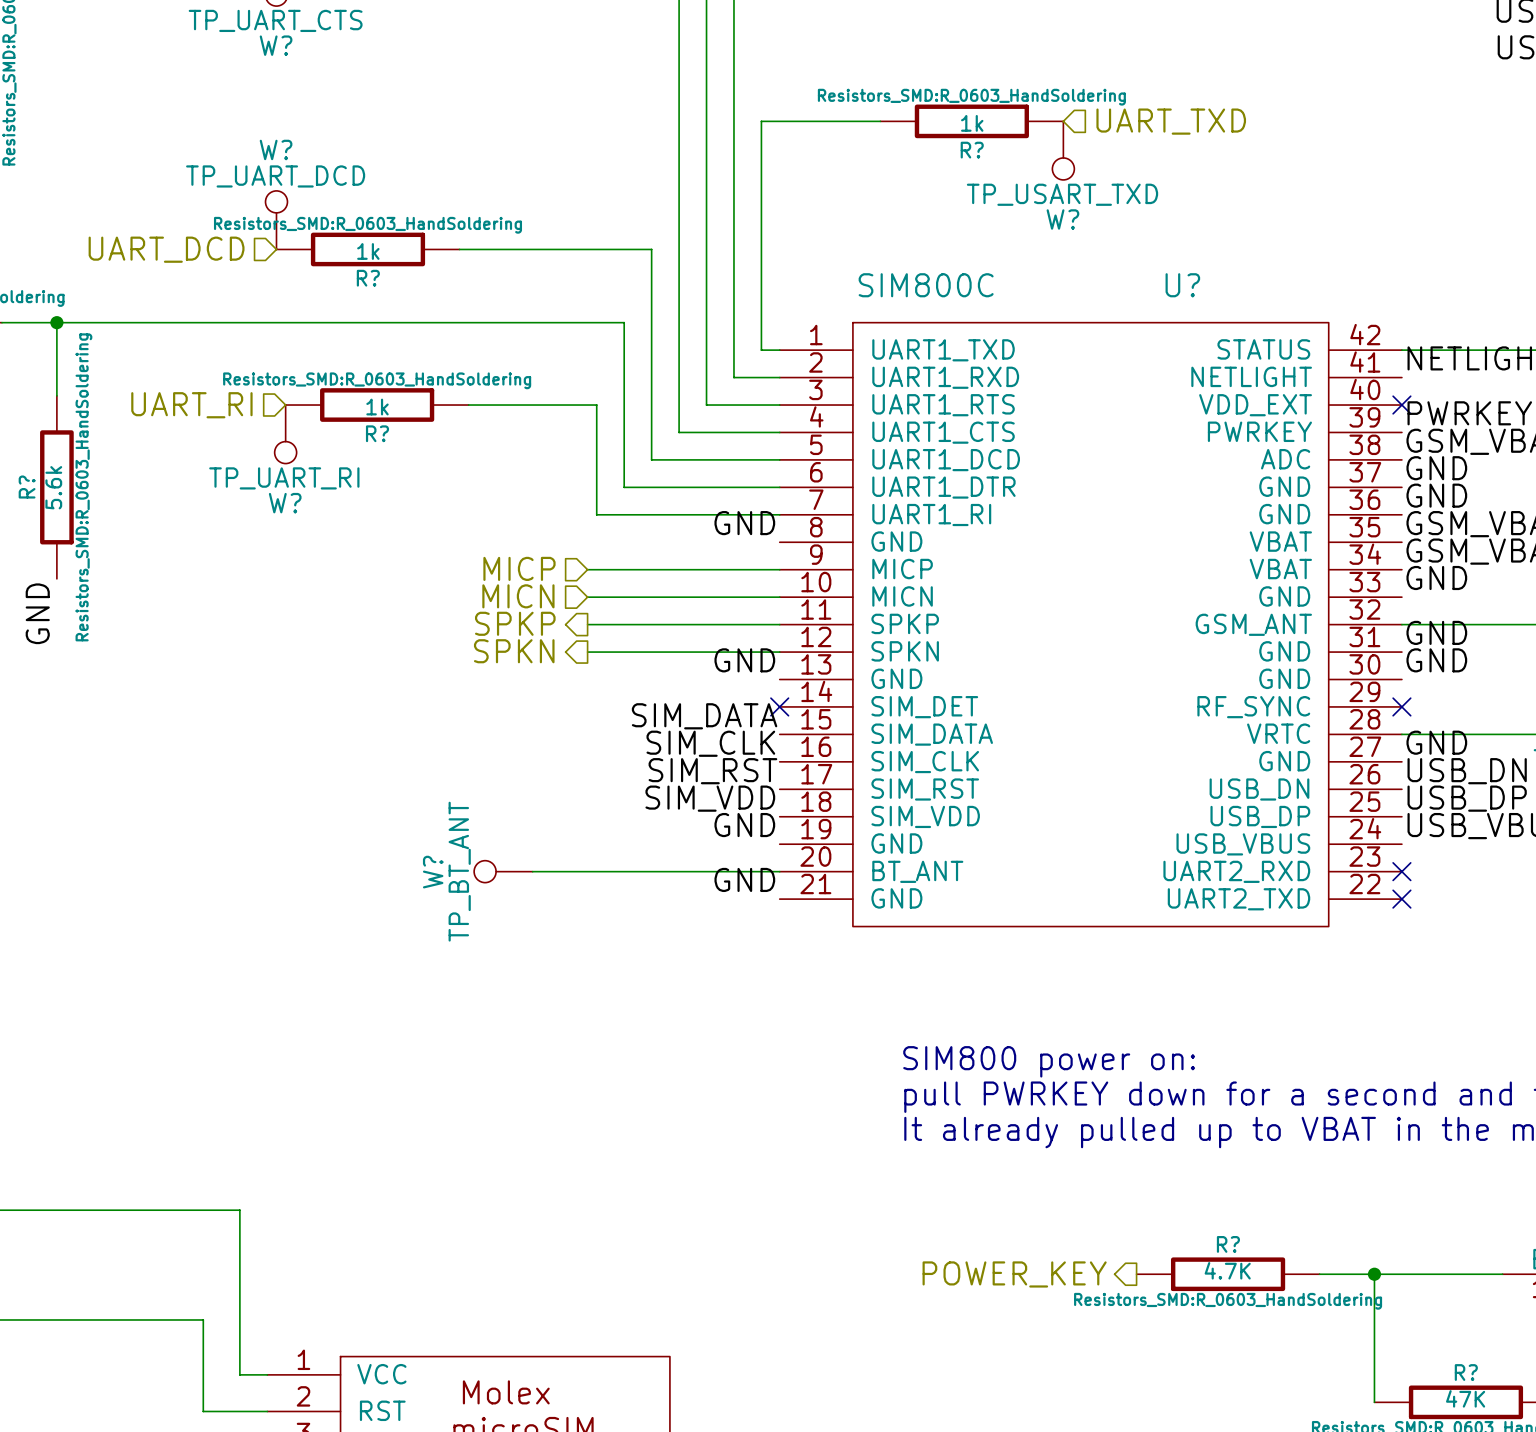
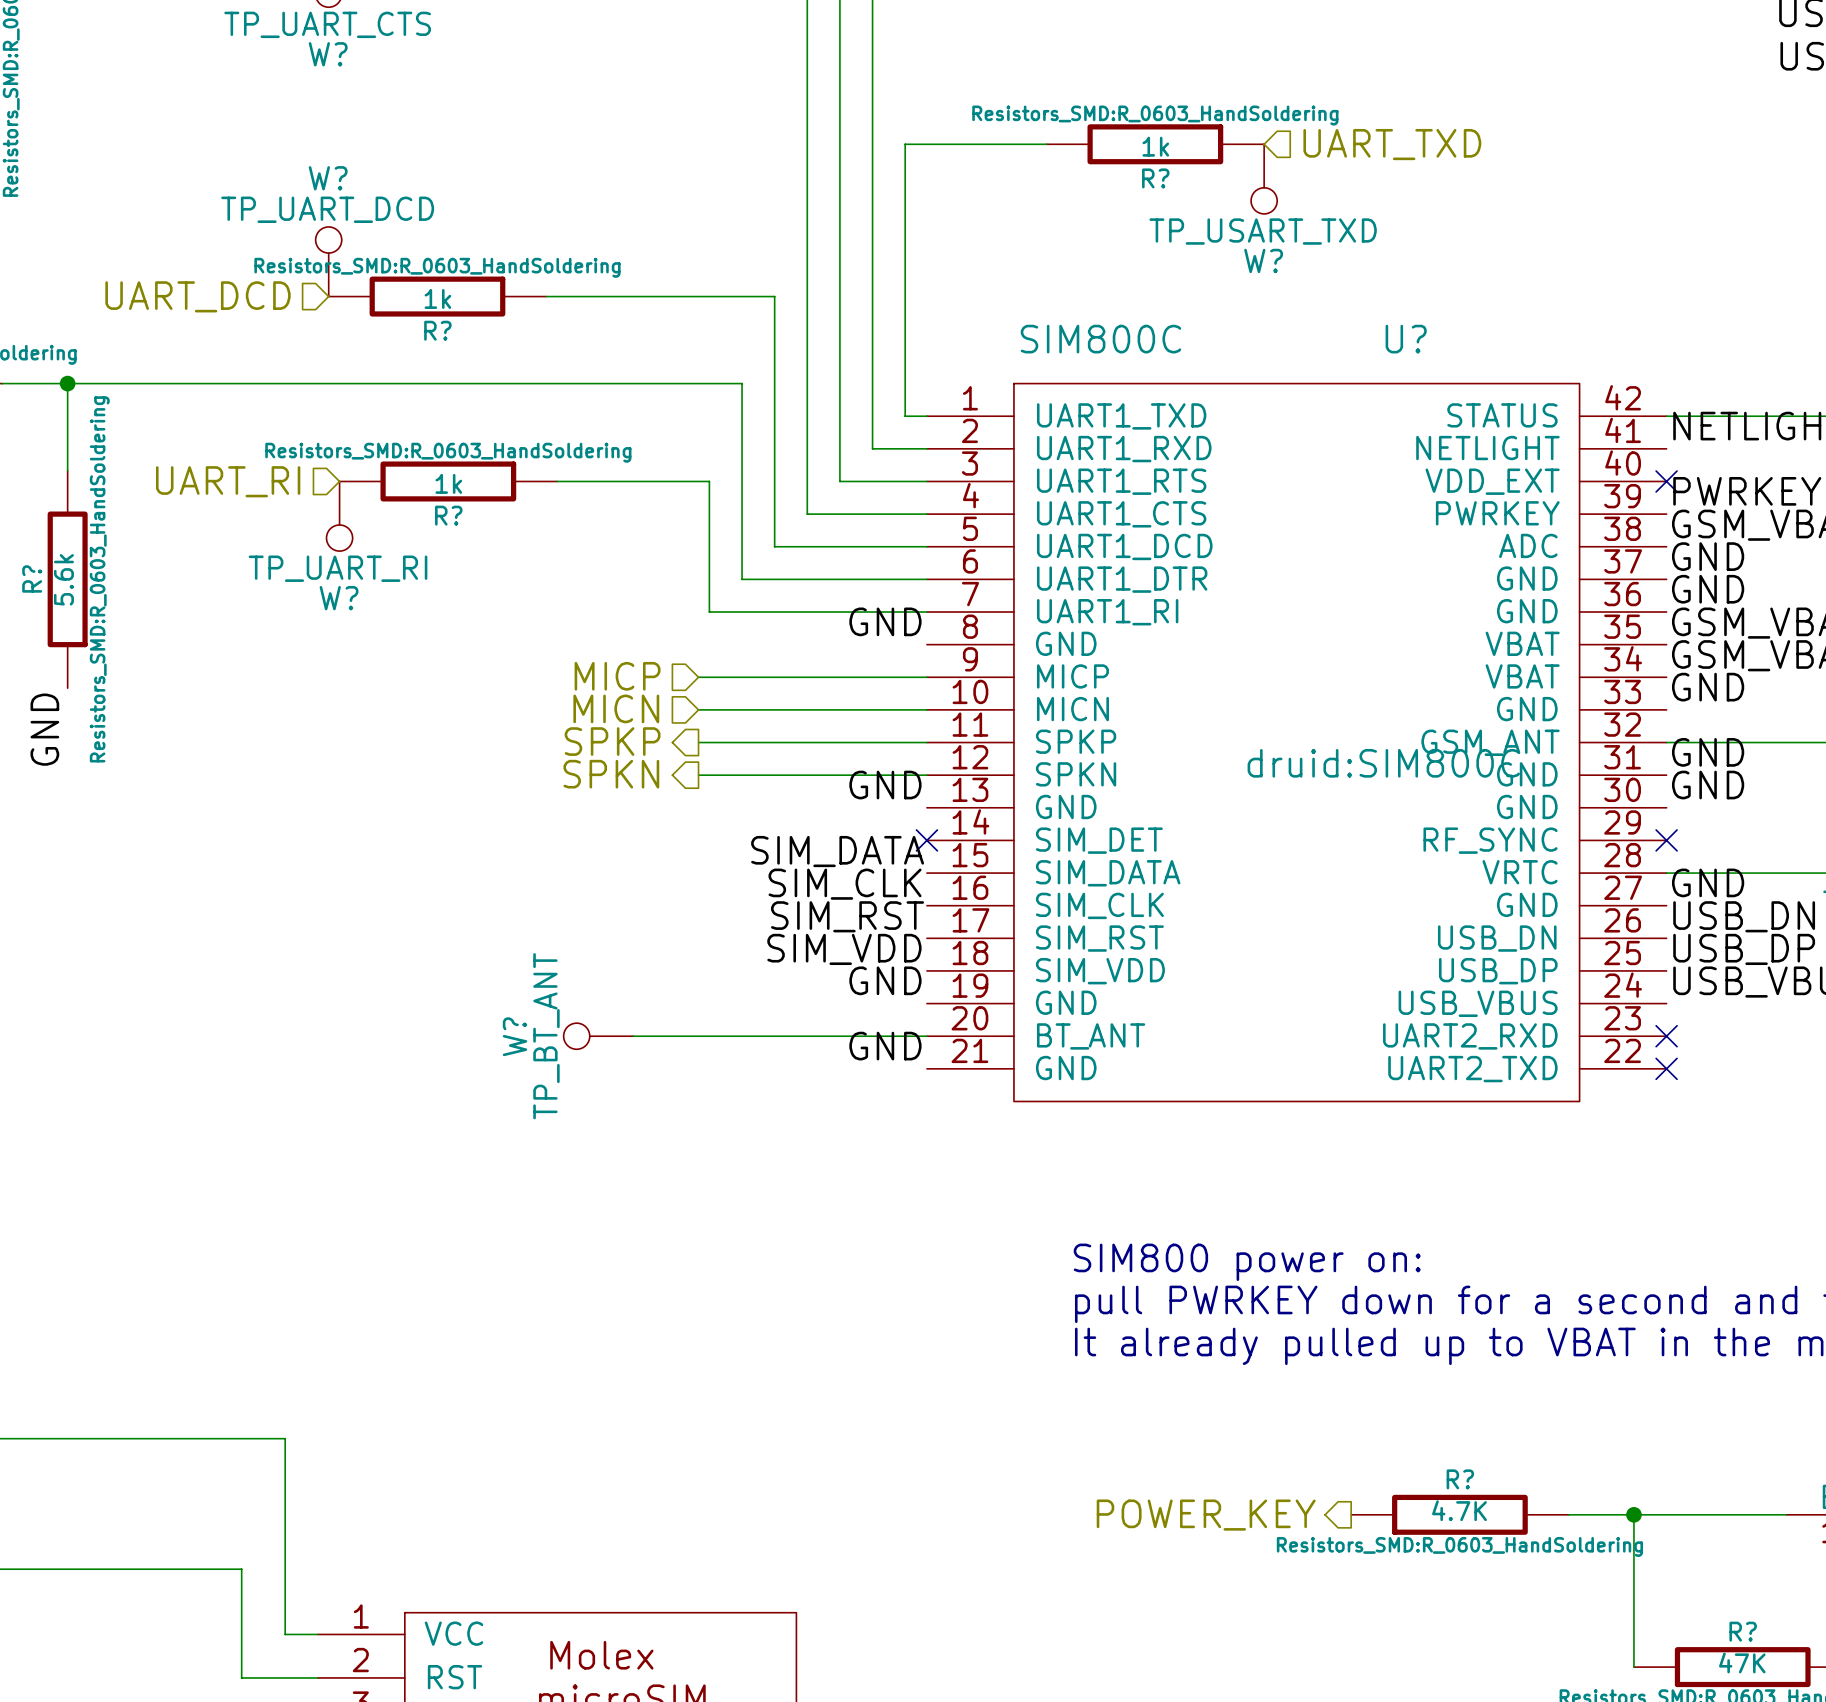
U? text: none -> druid:SIM800C (1383, 763)

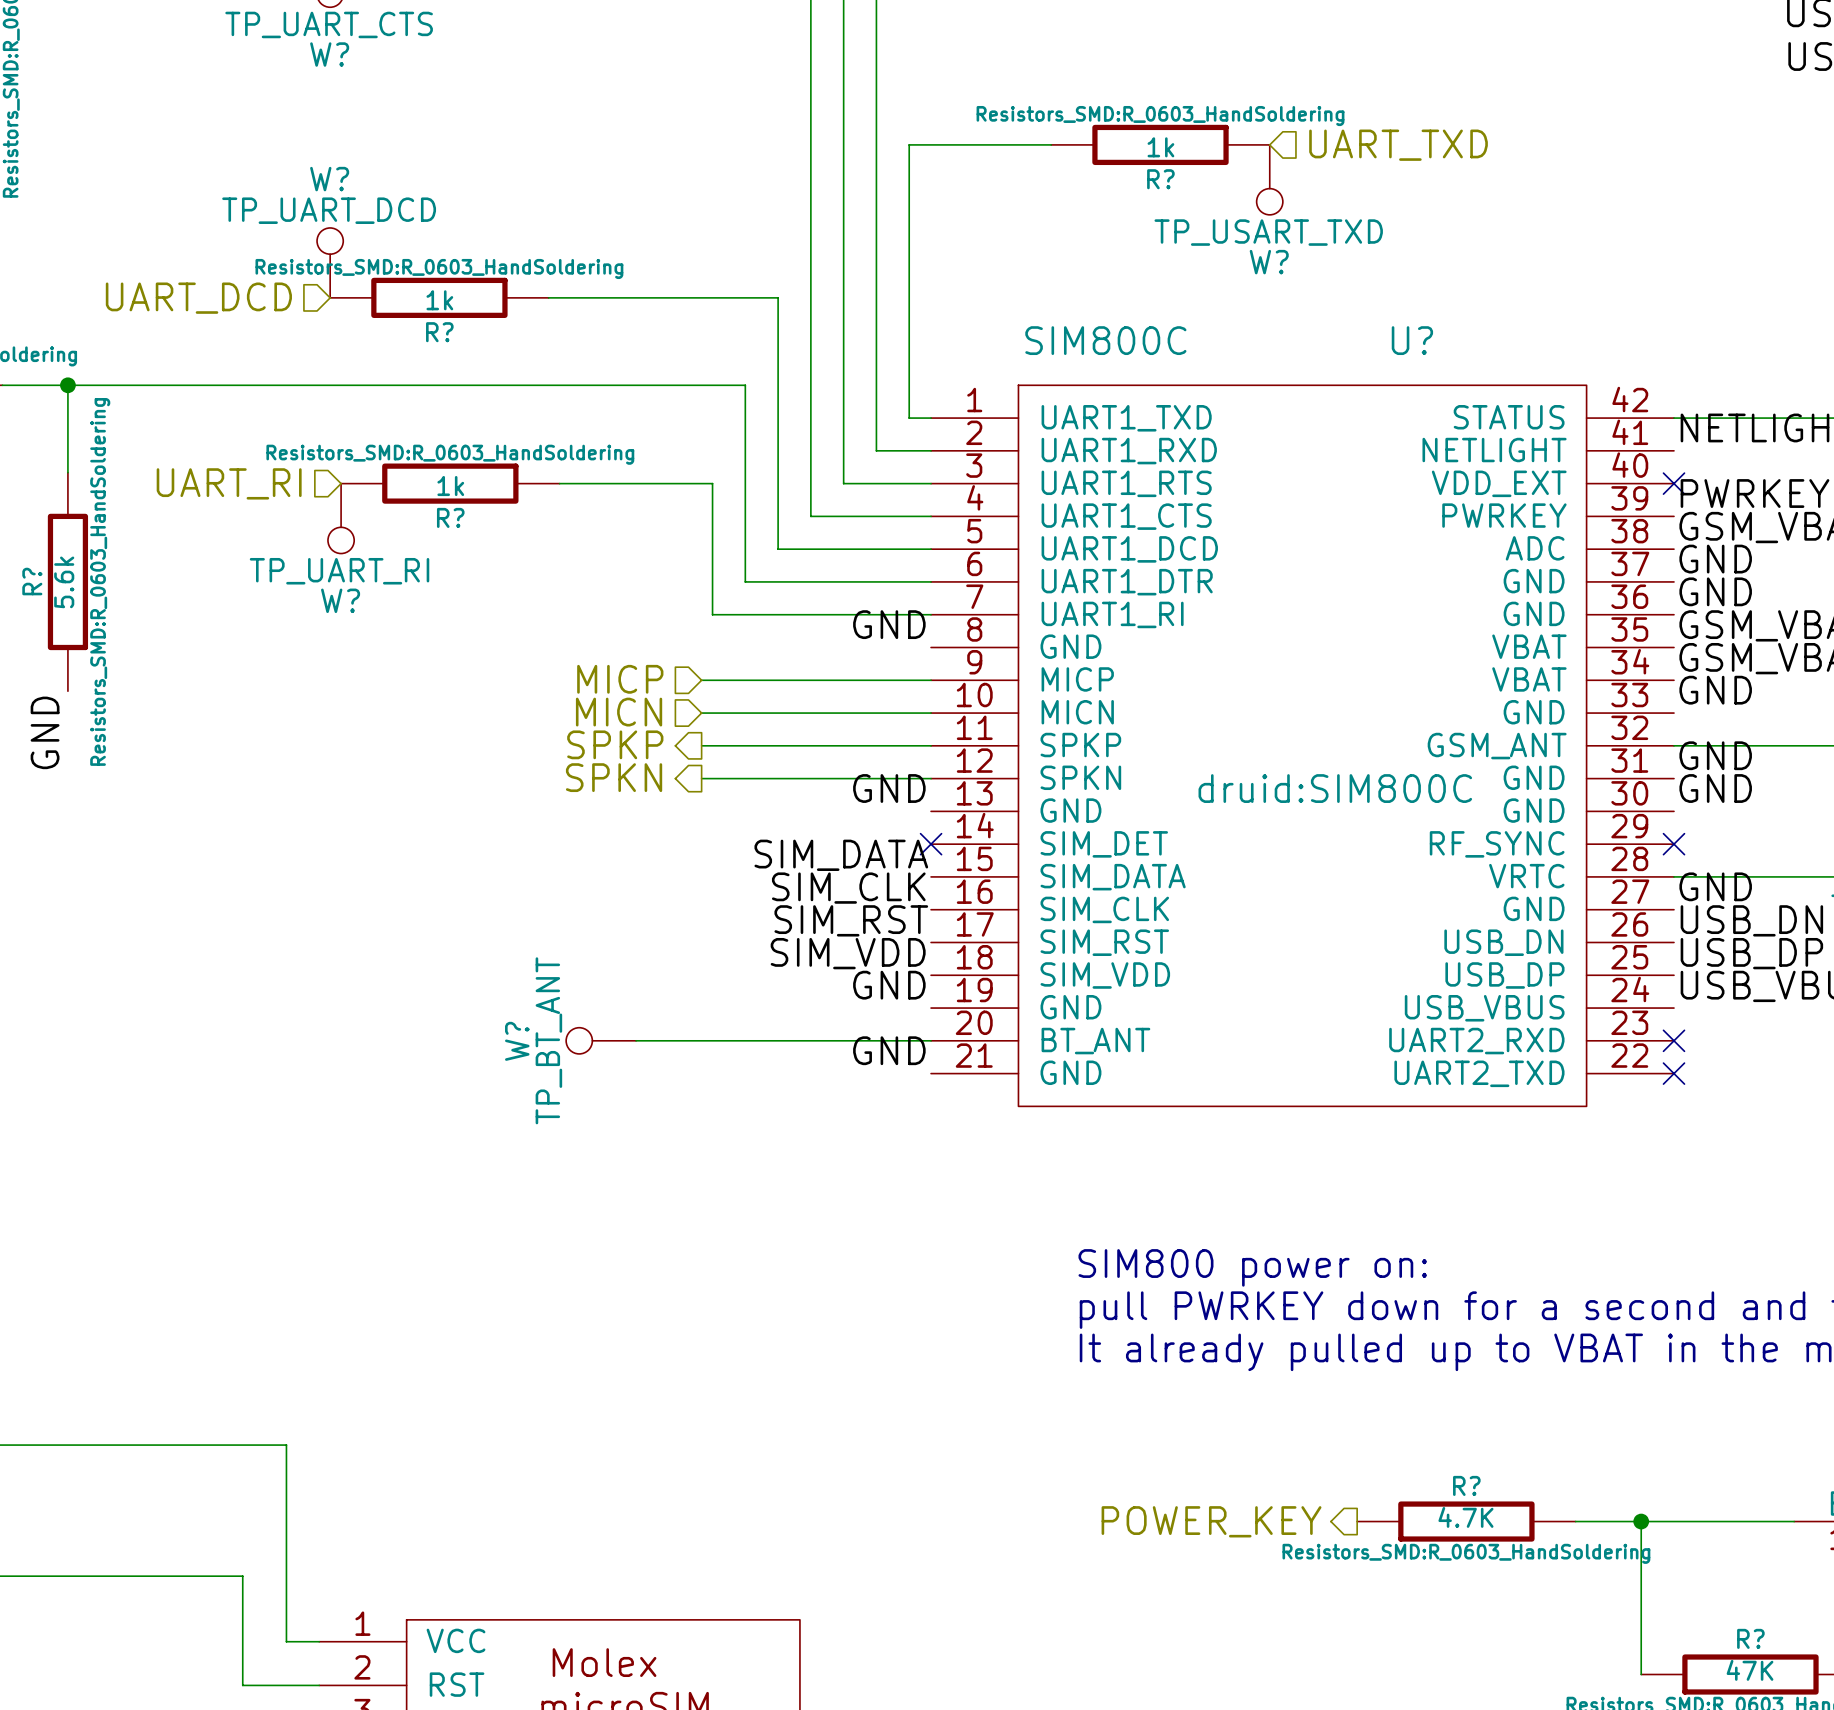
U? text position: druid:SIM800C (1383, 763) -> druid:SIM800C (1335, 788)

